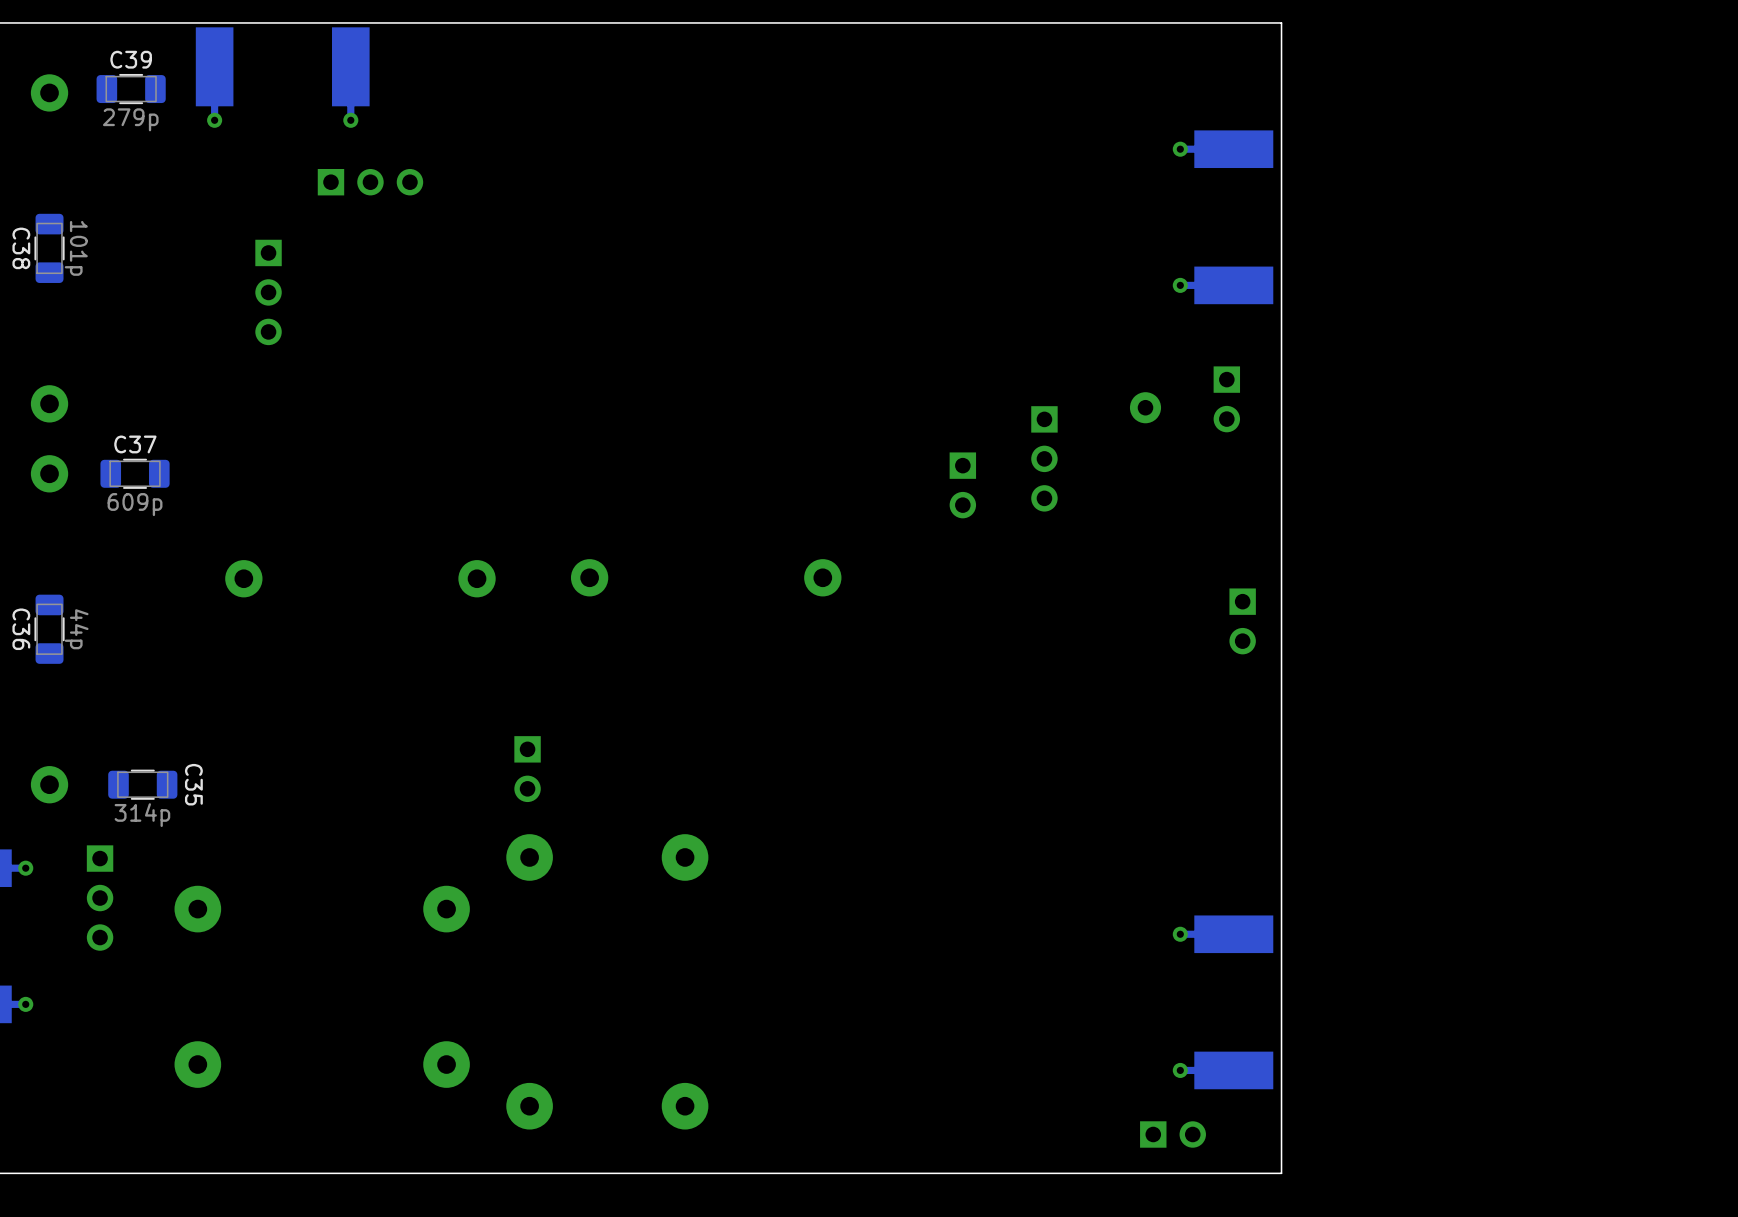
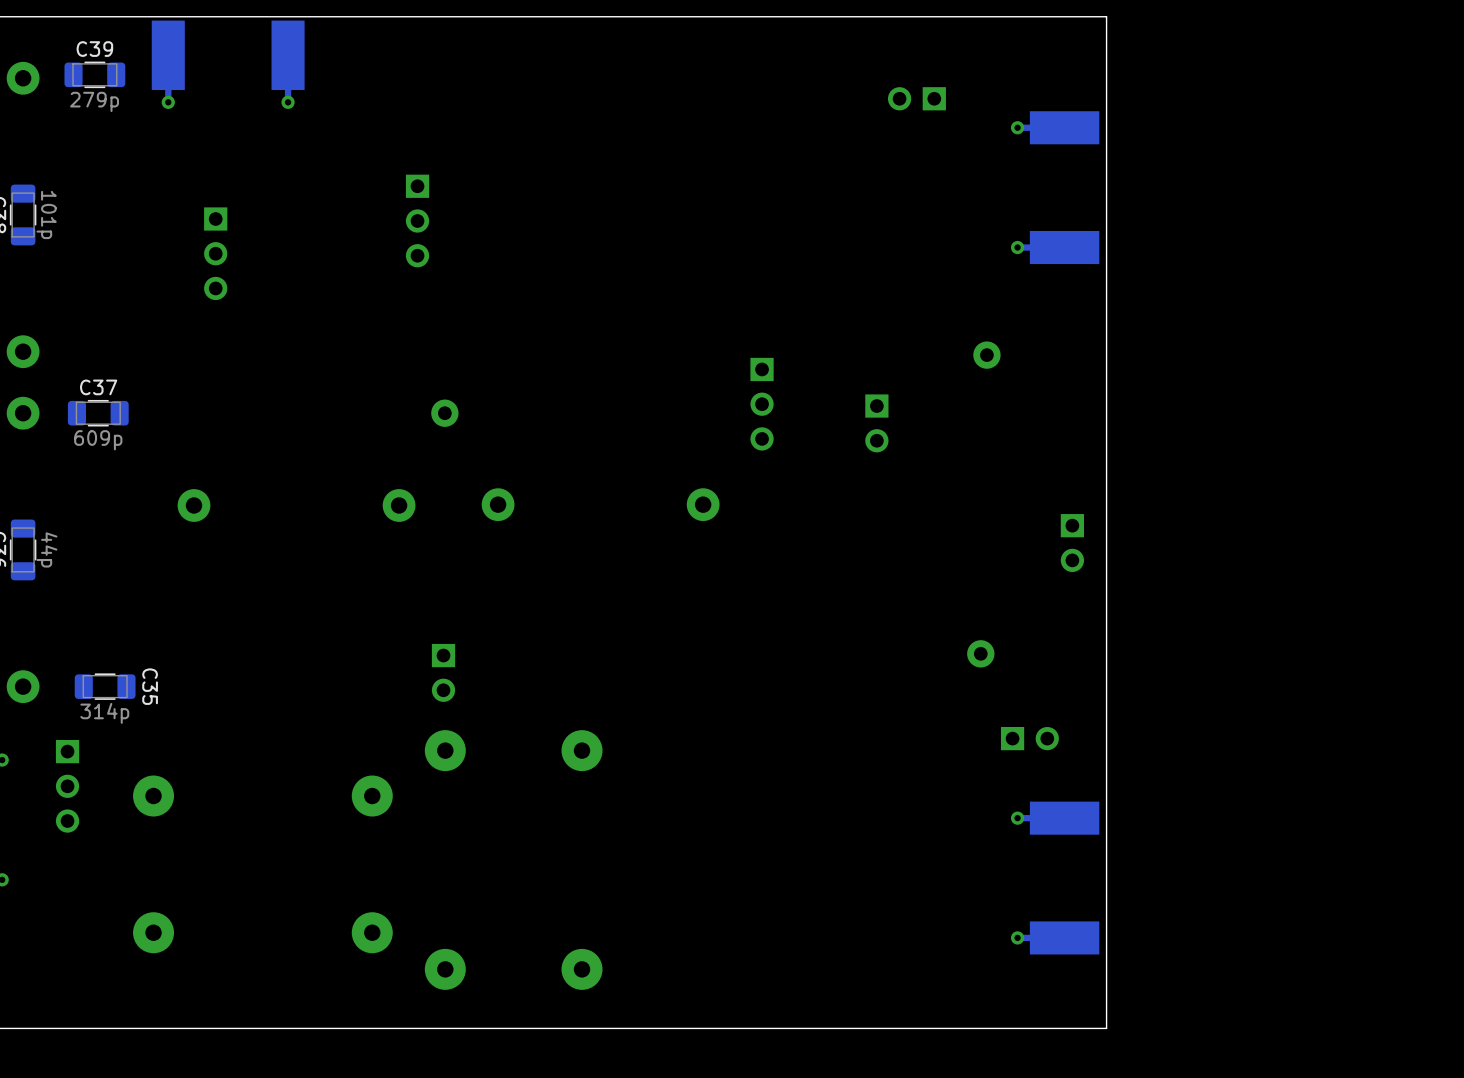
part: none -> (916, 98)
part rotation: 0° (370, 182) -> 90° clockwise (417, 220)
part position: (370, 182) -> (417, 220)
part: (1226, 399) -> none
part position: (1044, 458) -> (762, 404)
part: none -> (444, 413)
part position: (962, 485) -> (876, 423)
part: none -> (980, 653)
part: none -> (1029, 738)
part: (1173, 1134) -> none

